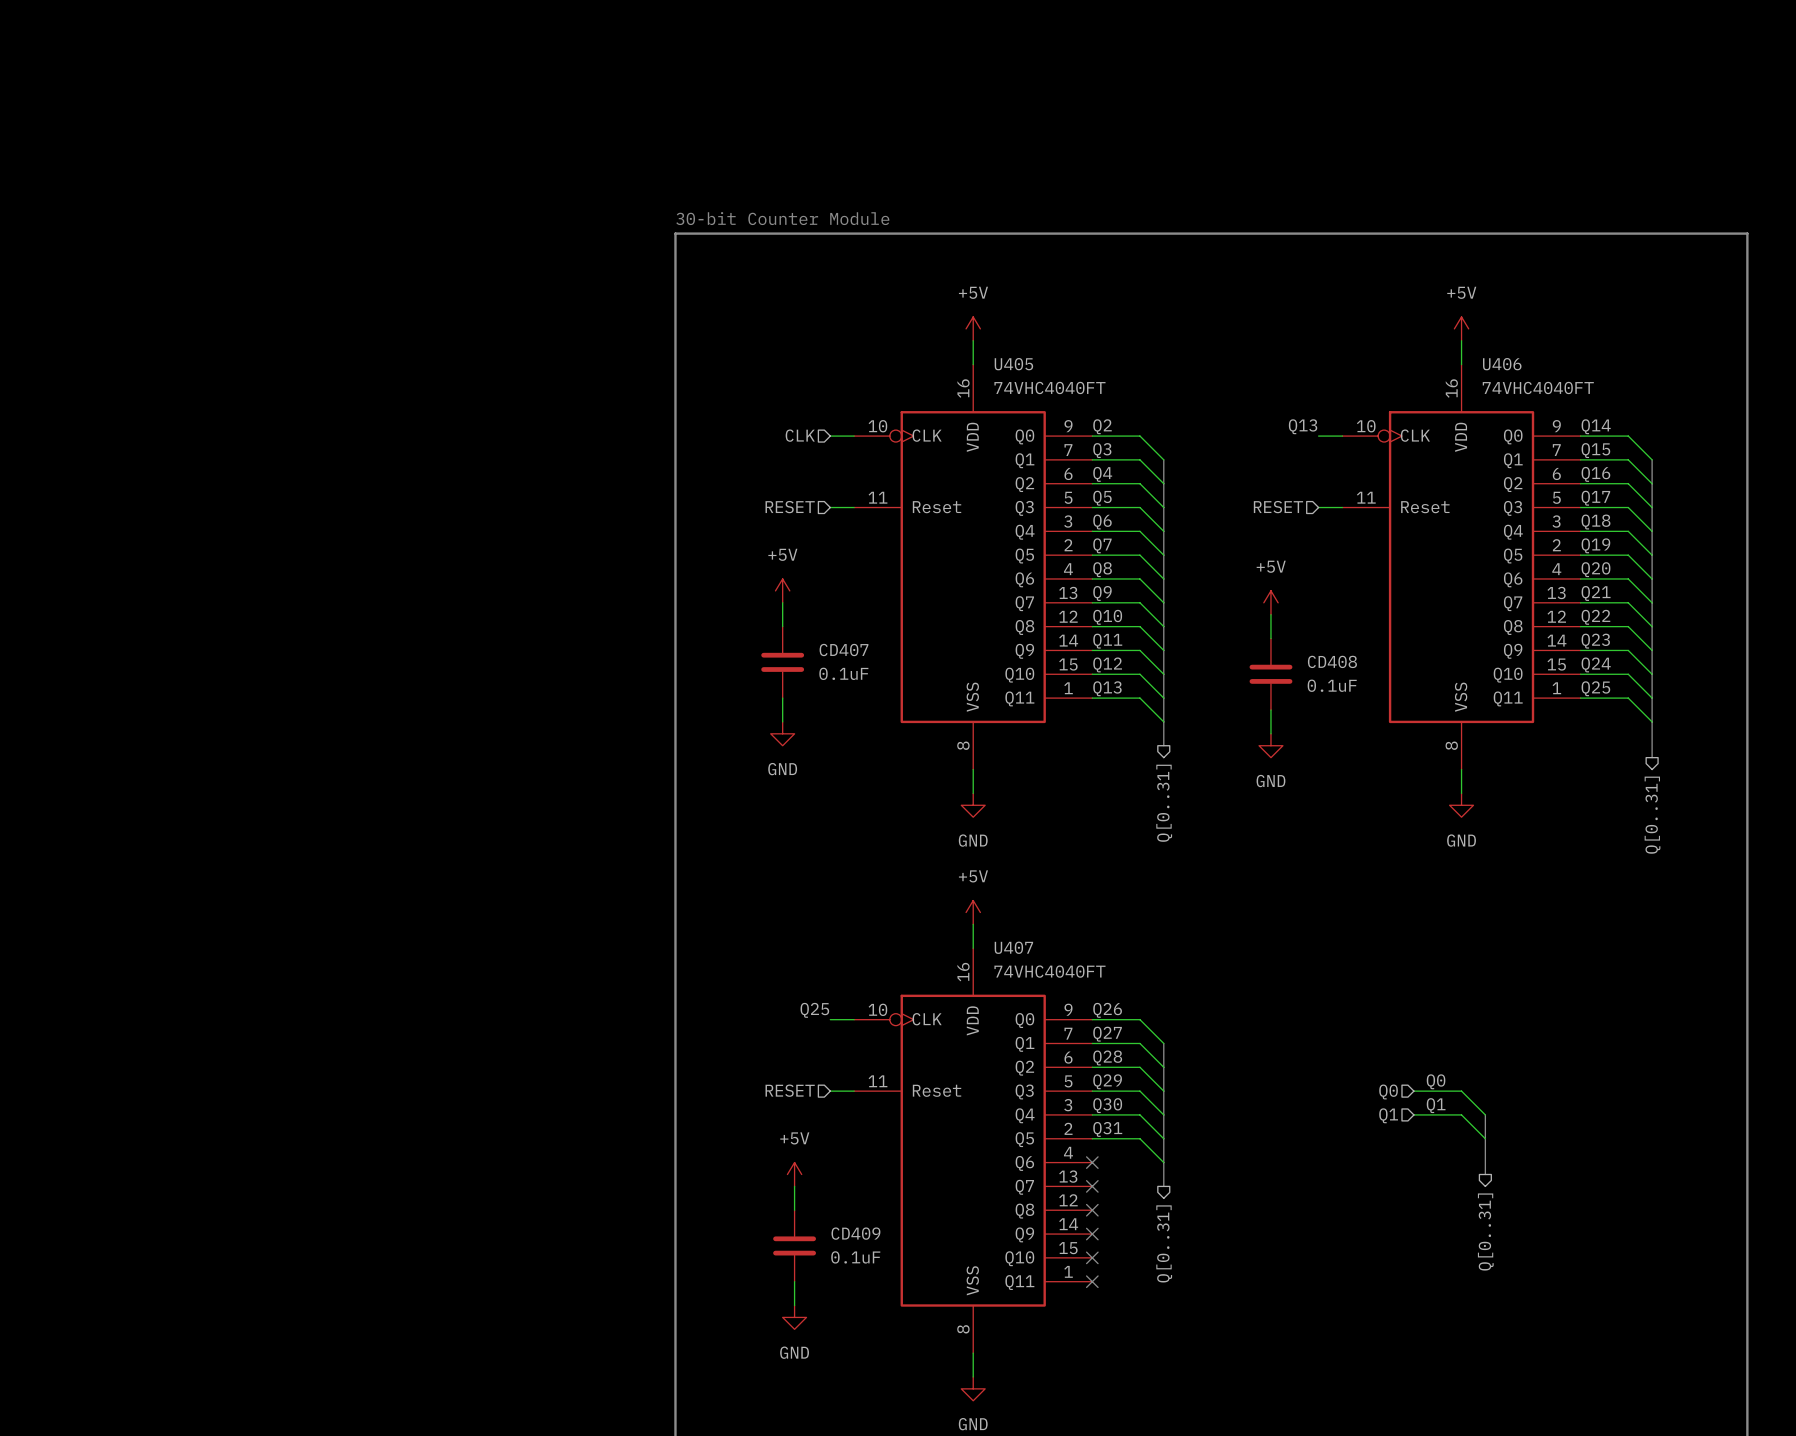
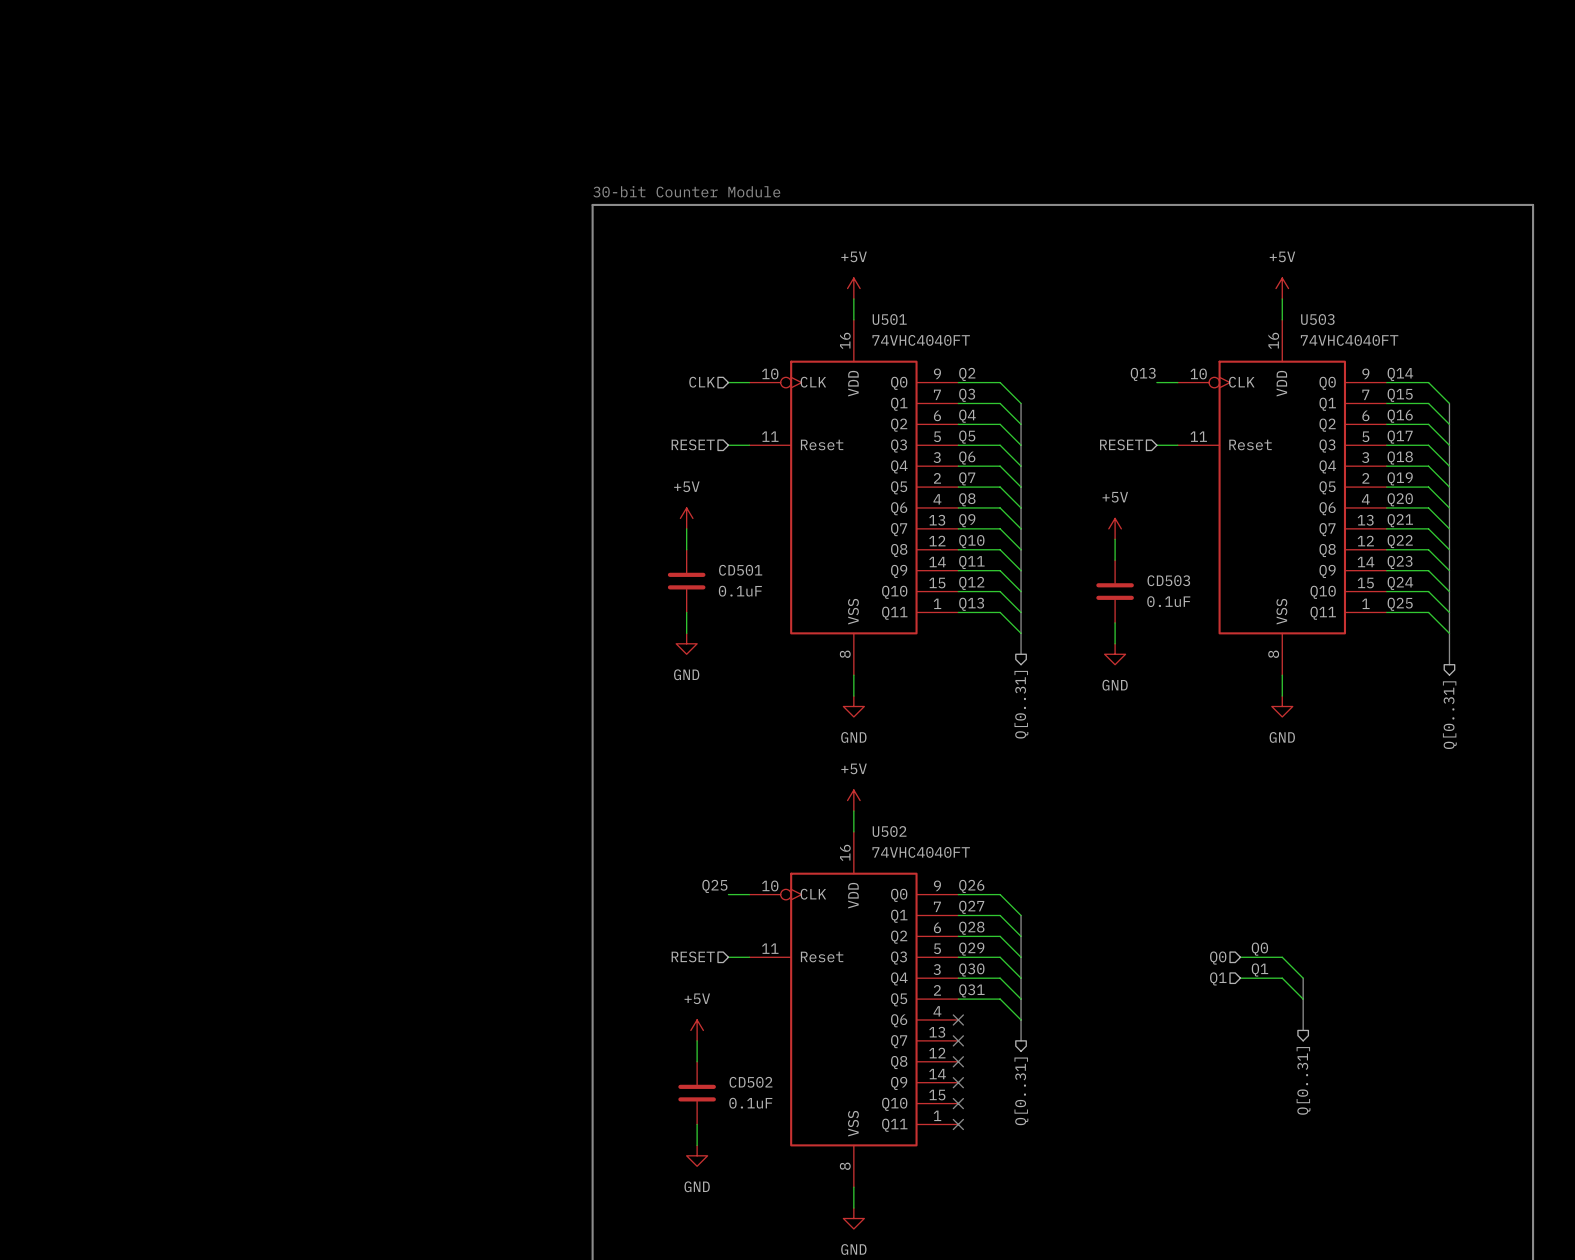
U405 name: U405 (1013, 364) -> U501 (889, 319)
U406 name: U406 (1502, 364) -> U503 (1317, 319)
CD407 name: CD407 (844, 650) -> CD501 (740, 570)
CD408 name: CD408 (1332, 661) -> CD503 (1168, 580)
U407 name: U407 (1013, 947) -> U502 (889, 831)
CD409 name: CD409 (855, 1233) -> CD502 (750, 1082)

